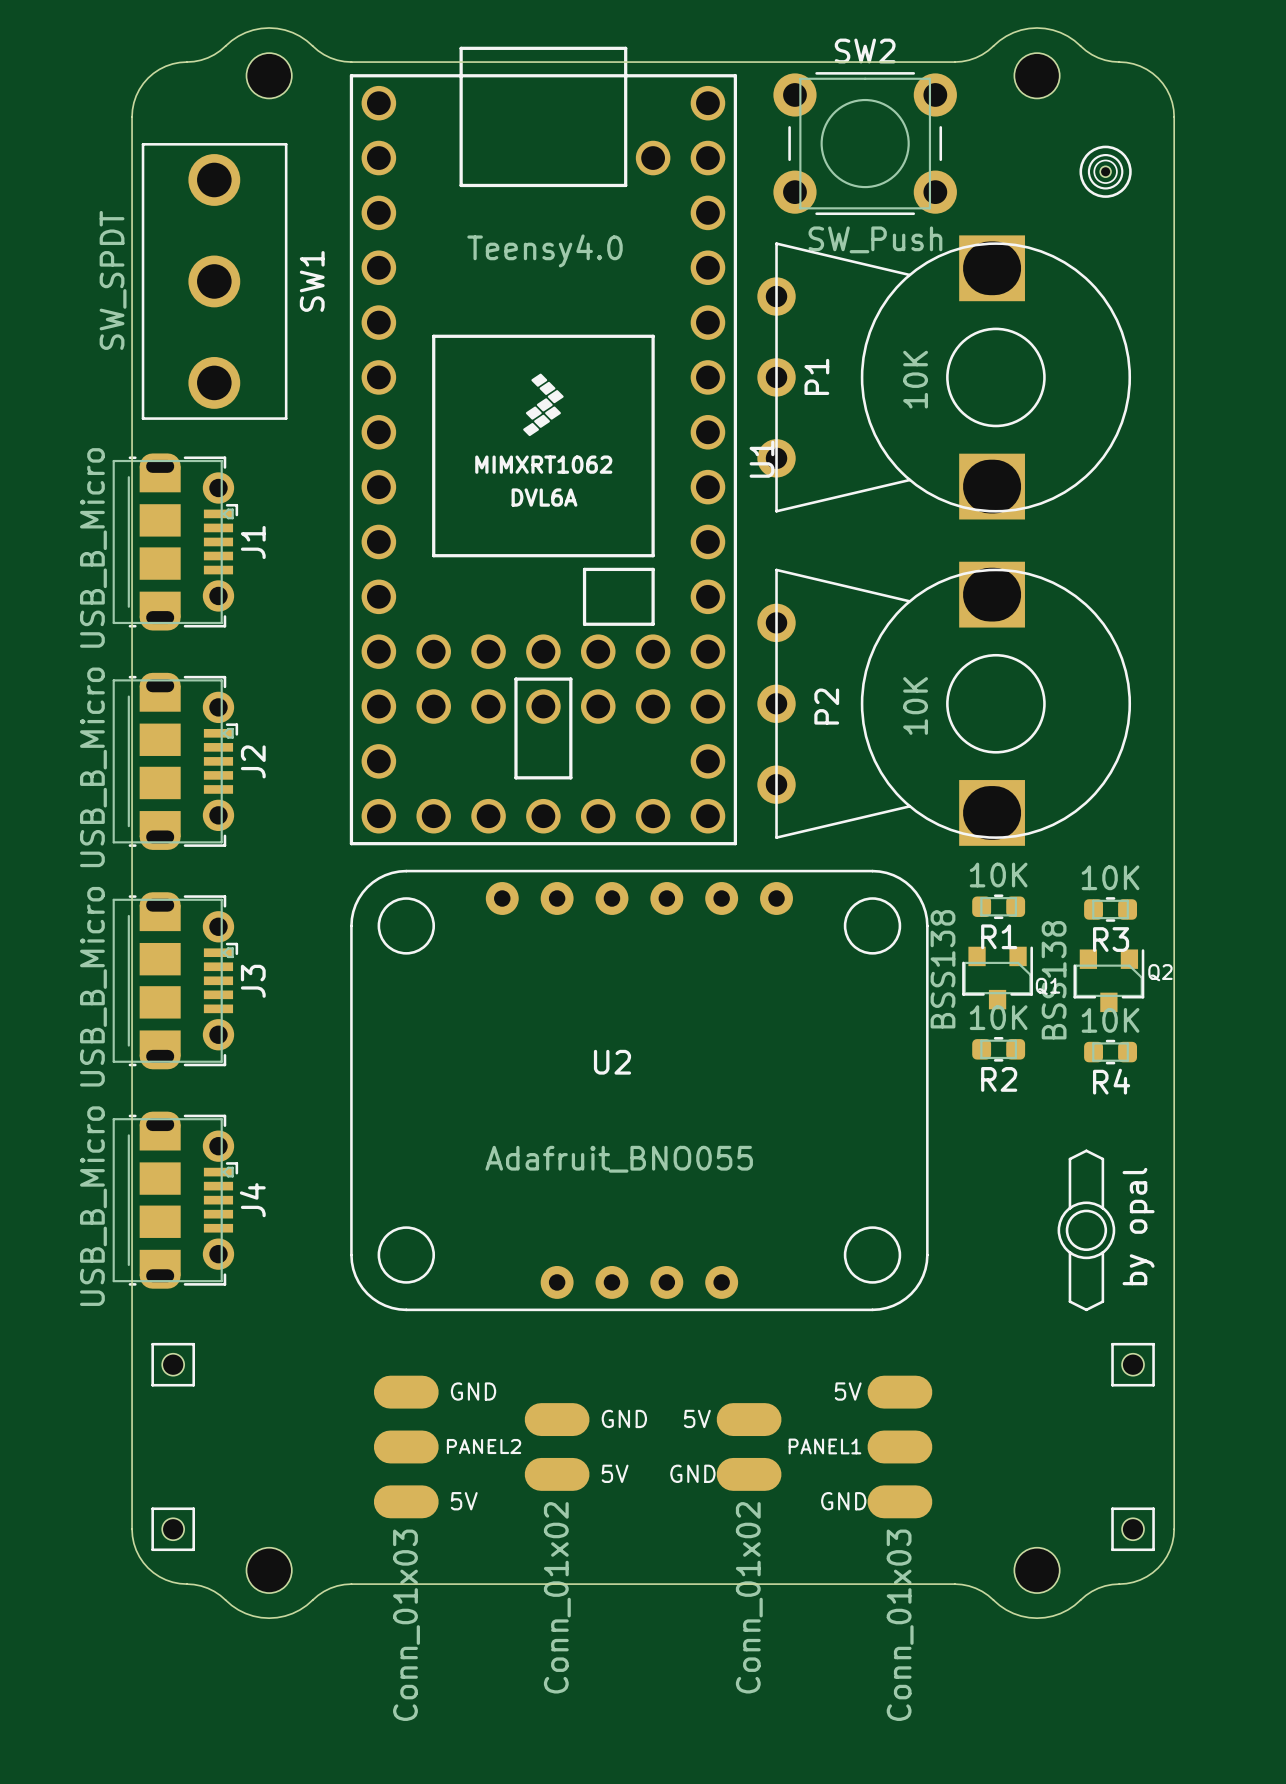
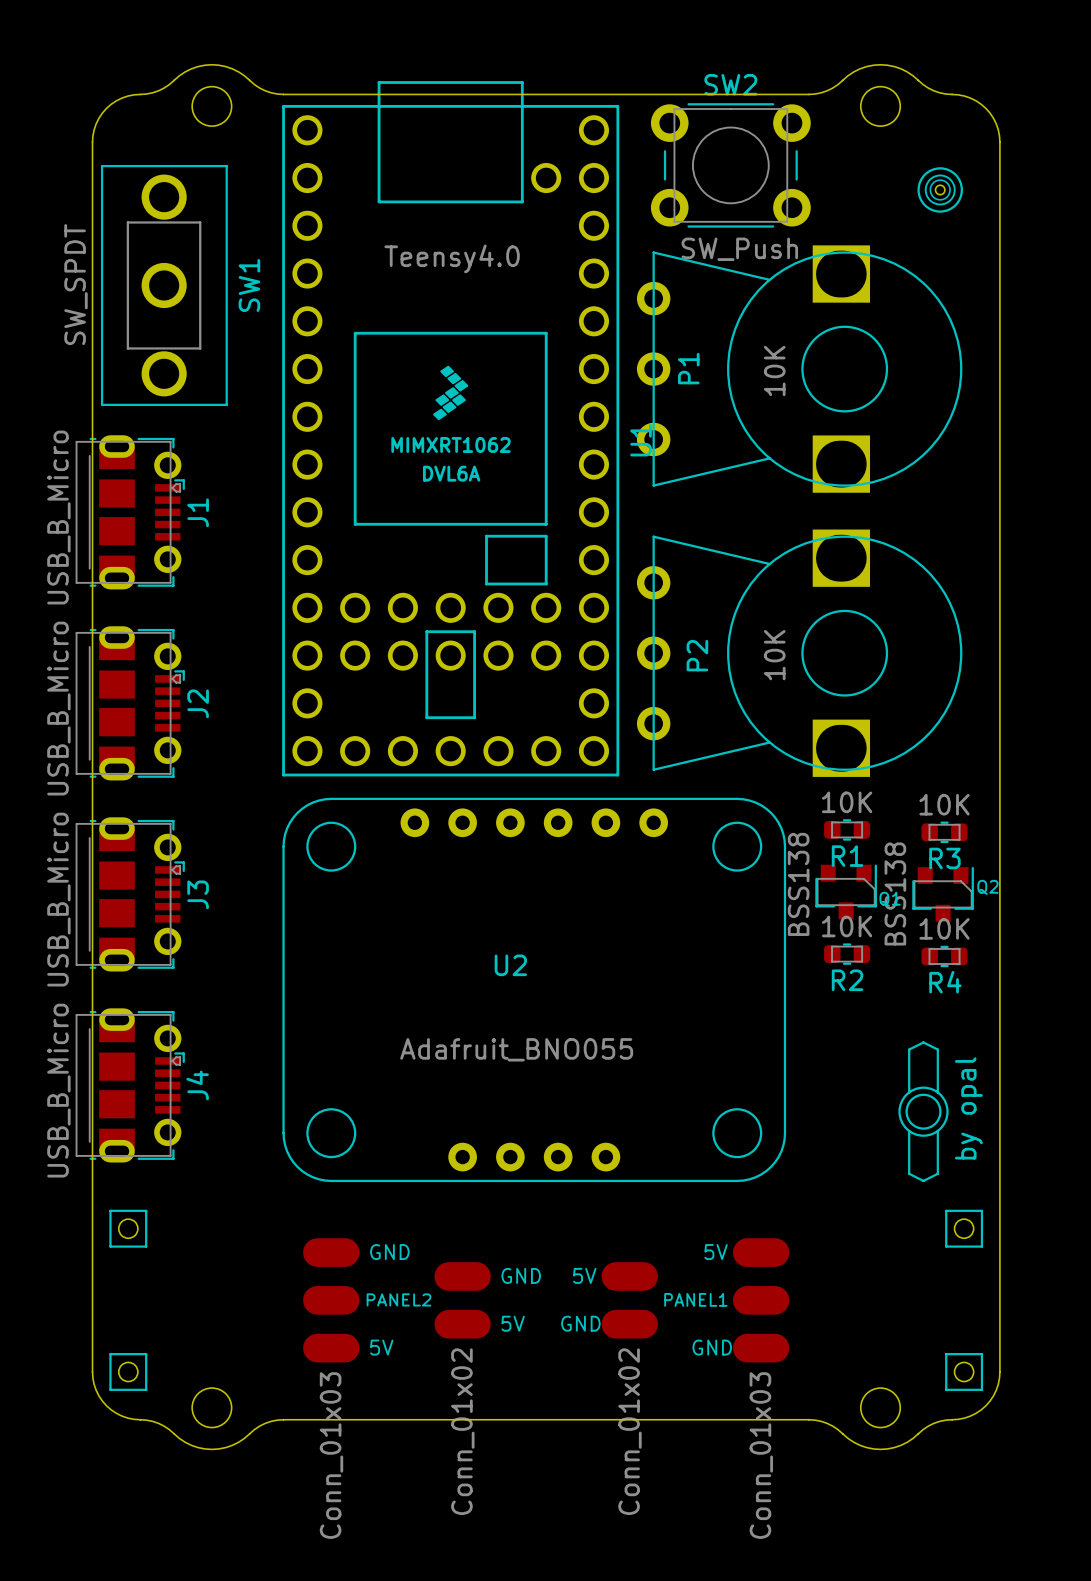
SW1 footprint: [141, 143, 288, 420] -> [100, 164, 228, 407]

